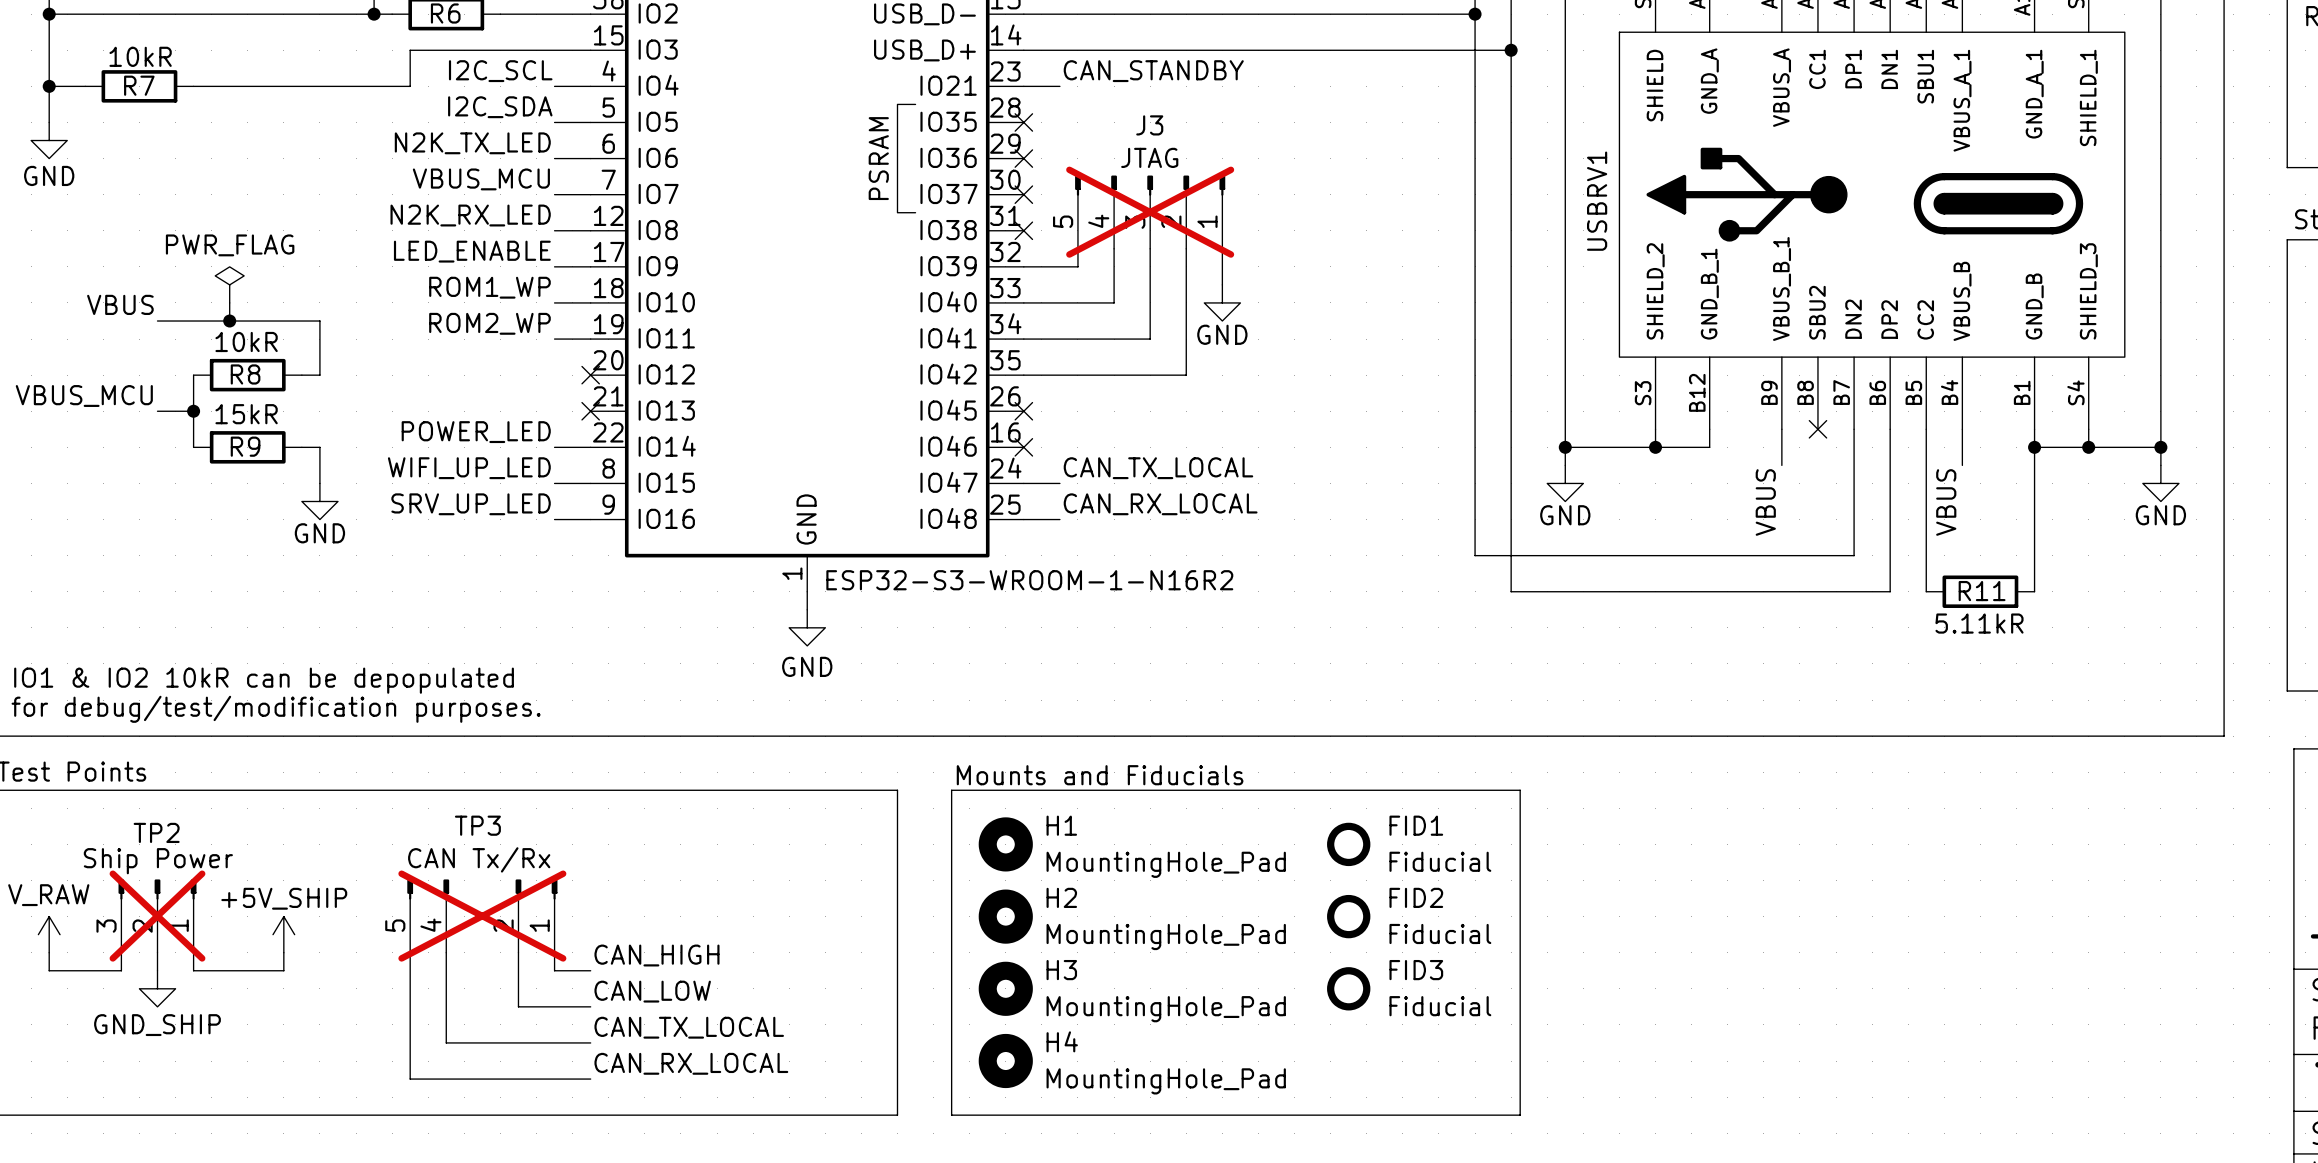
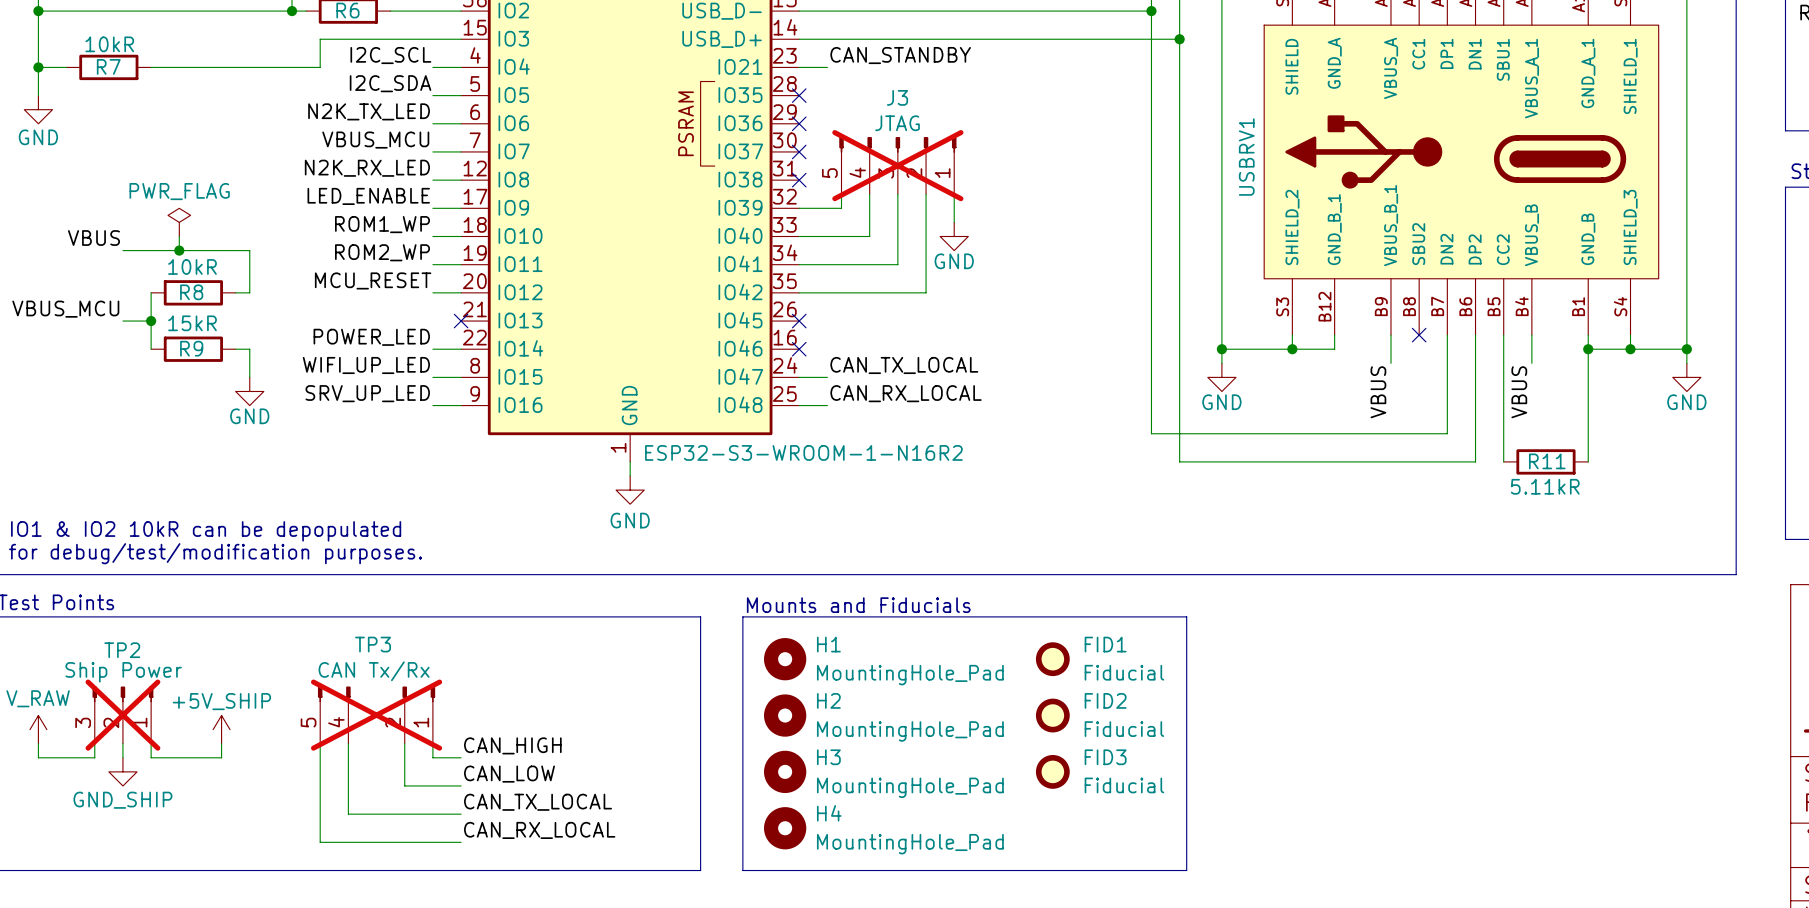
label: none -> MCU_RESET (373, 280)
wire: none -> (432, 292) (461, 292)
no-connect mark: (590, 375) -> none

